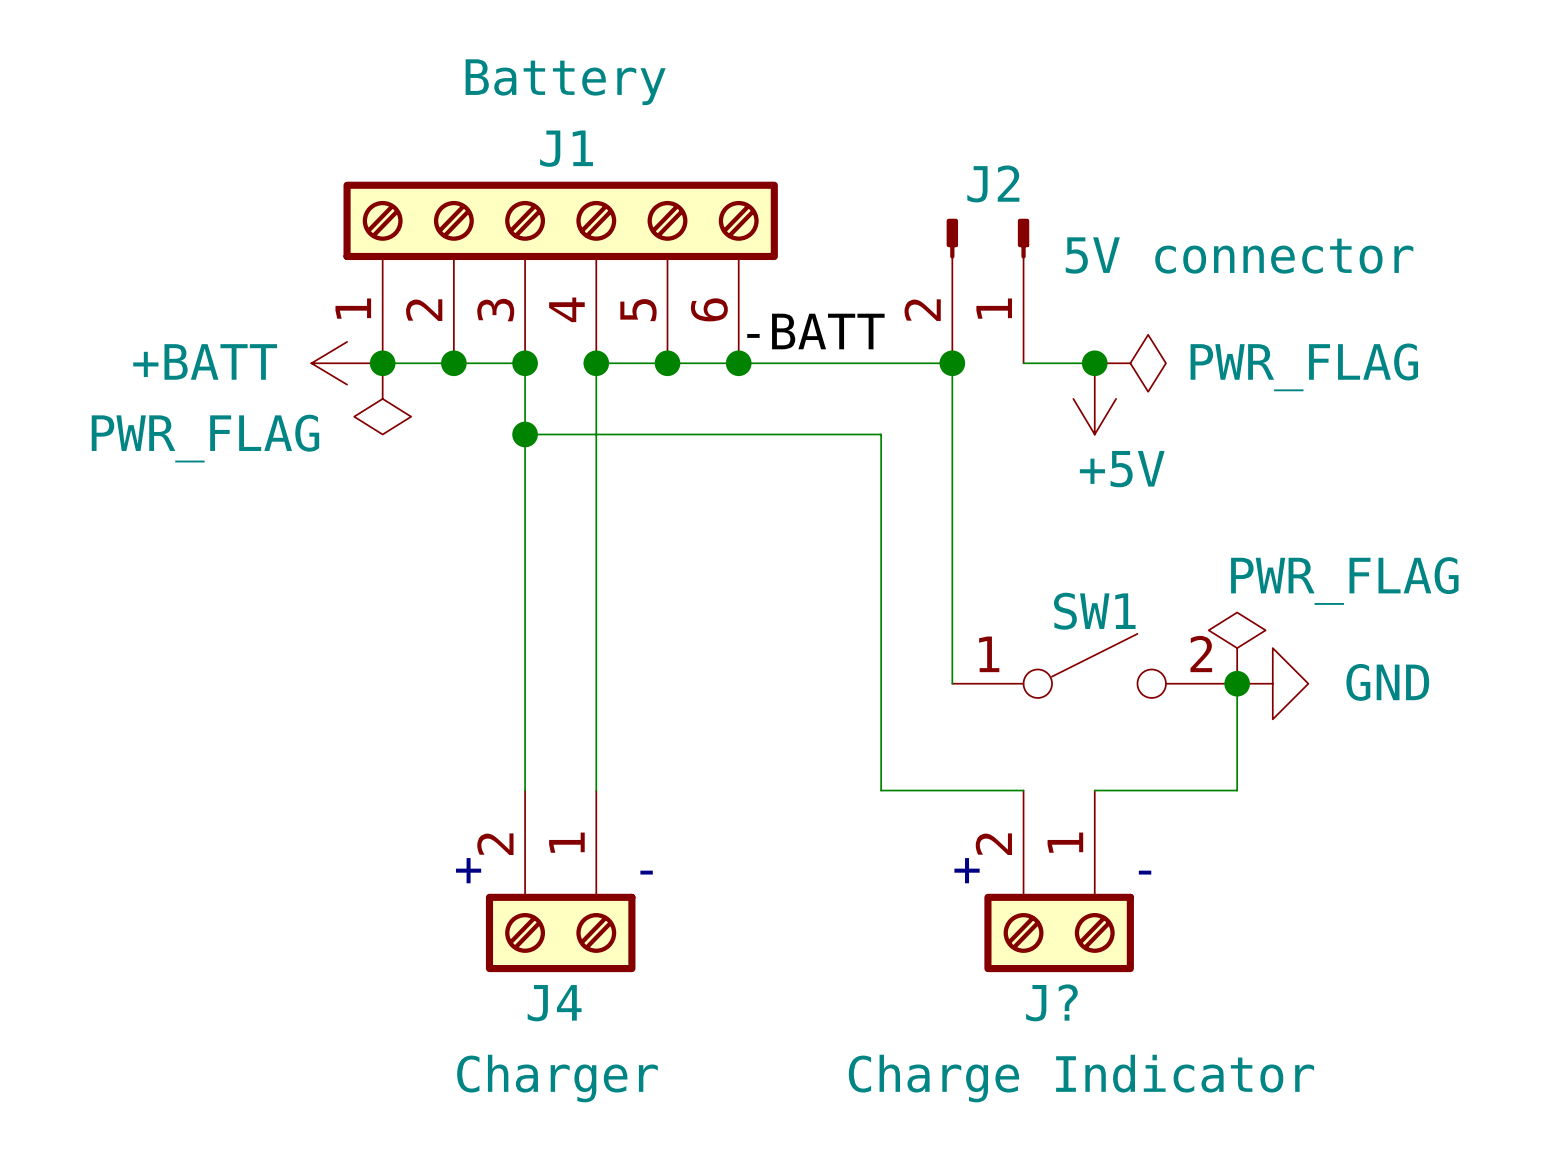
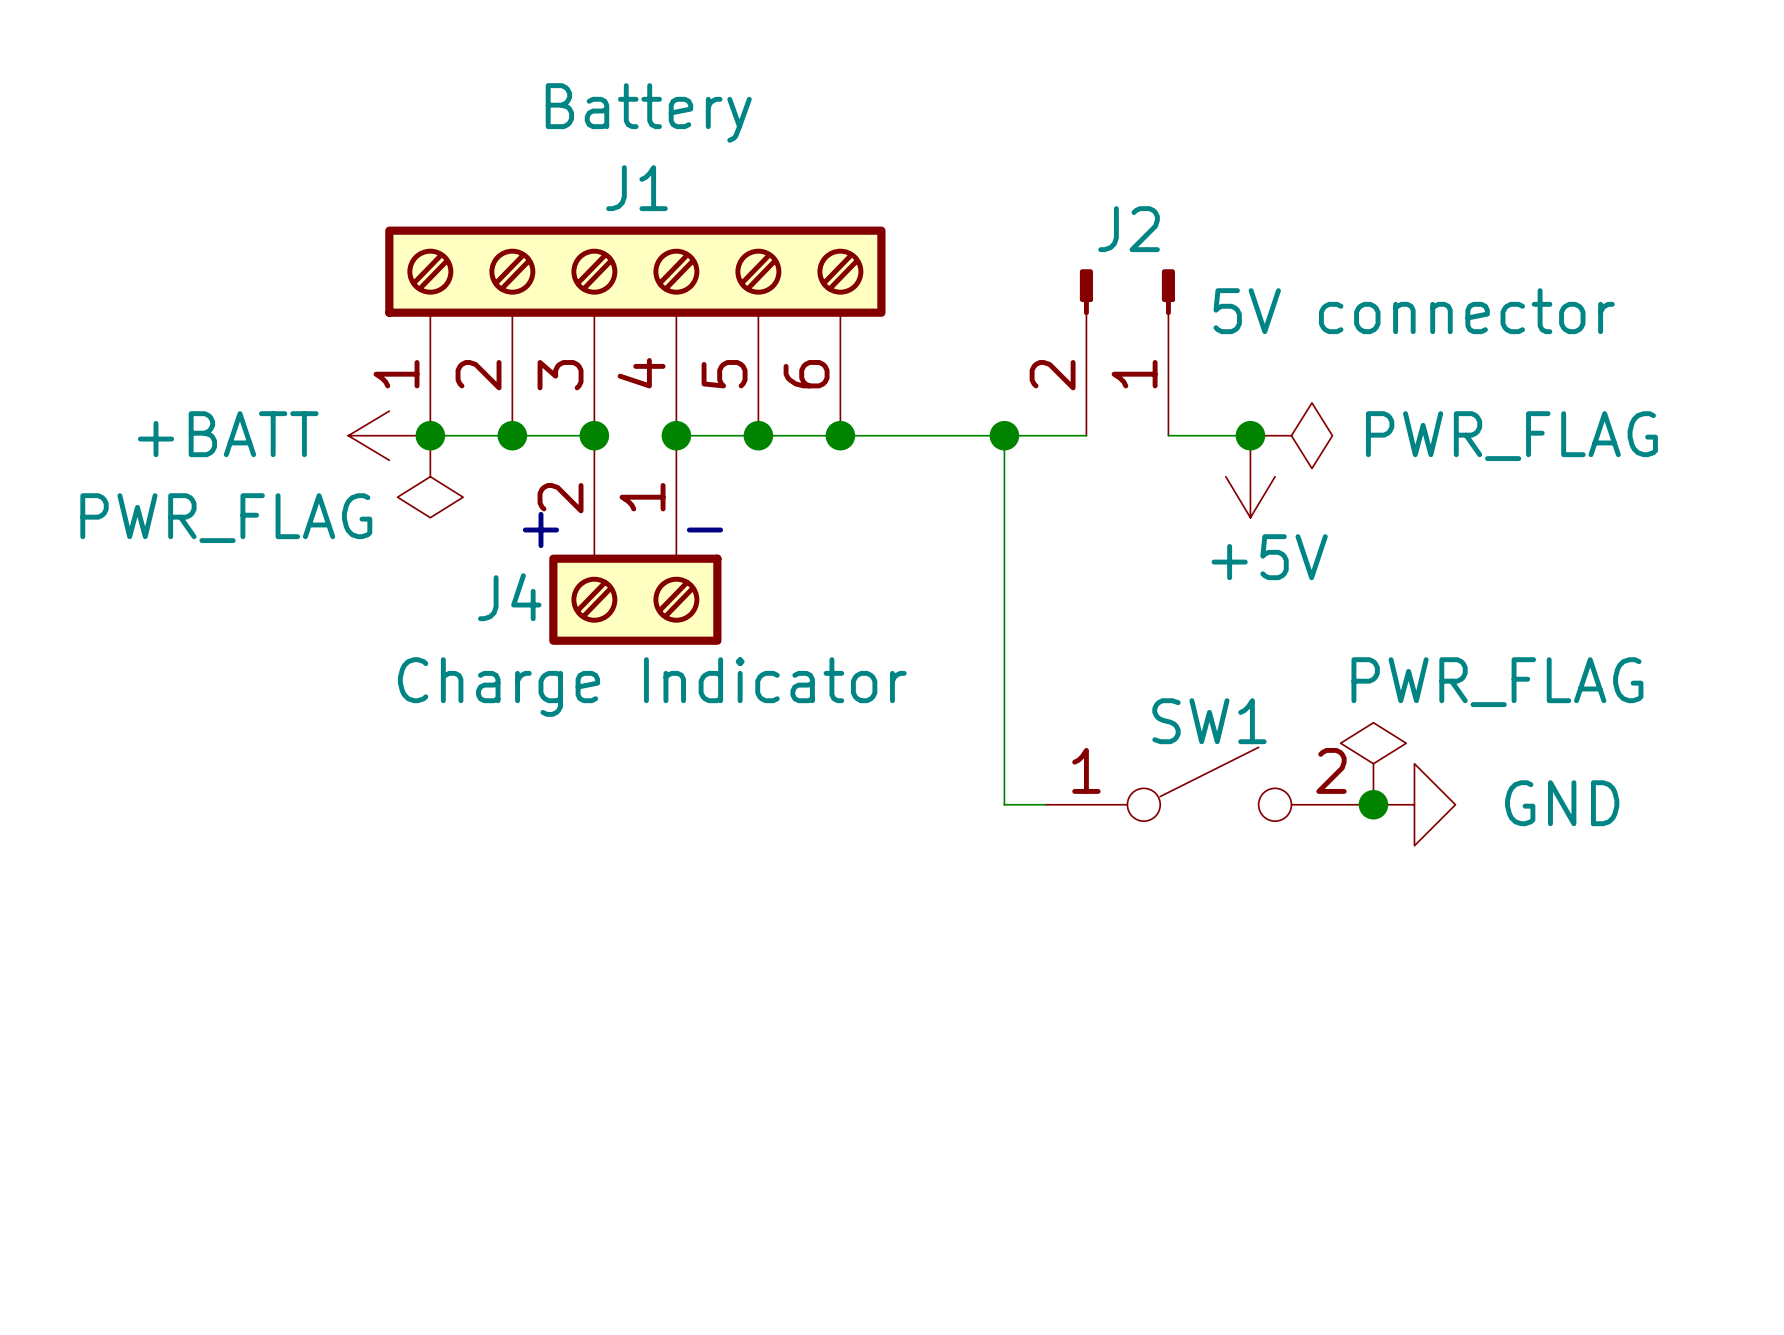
label: -BATT (815, 331) -> none
wire: (525, 363) (525, 790) -> none
wire: (596, 363) (596, 790) -> none
wire: (952, 363) (952, 683) -> none
junction position: (952, 363) -> (1004, 435)
wire: (525, 434) (881, 434) -> (1004, 435) (1004, 517)
junction: (525, 434) -> none
text: none -> + (540, 530)
text: none -> - (705, 530)
power symbol position: PWR_FLAG (1237, 648) -> PWR_FLAG (1373, 763)
SW1 position: (1094, 665) -> (1209, 784)
wire: (881, 683) (881, 790) (1023, 790) -> (1004, 804) (1045, 804)
wire: (1237, 683) (1237, 790) (1094, 790) -> none
junction position: (1237, 683) -> (1373, 804)
power symbol position: GND (1272, 683) -> GND (1414, 804)
text: + (468, 870) -> none
text: + (967, 870) -> none
text: - (646, 872) -> none
text: - (1145, 872) -> none
J4 position: (560, 881) -> (635, 540)
J?: Charge Indicator (1059, 881) -> none
J4 name position: J4 (554, 1003) -> J4 (509, 597)
J4 value: Charger (557, 1078) -> Charge Indicator (652, 687)

